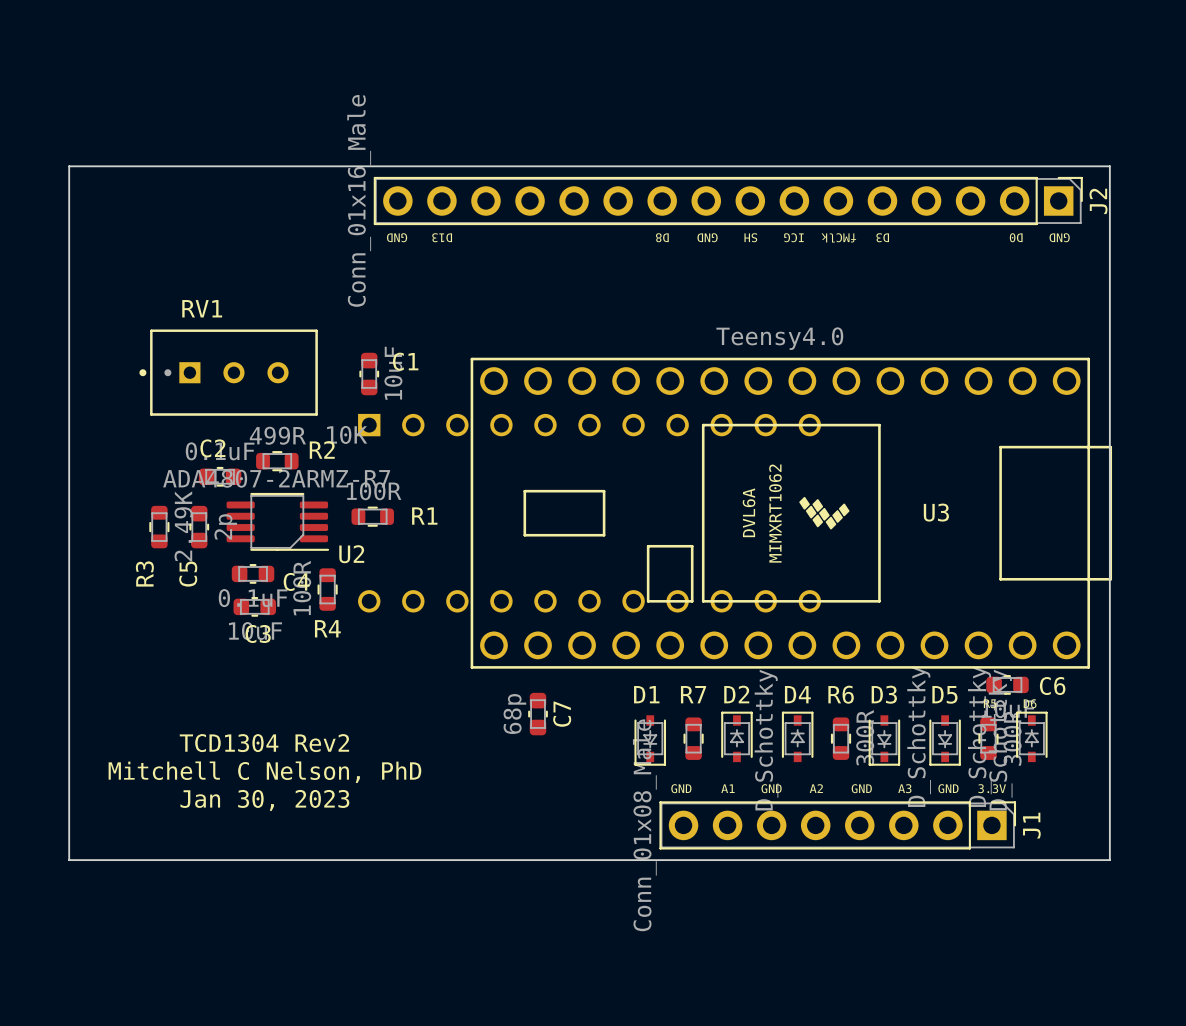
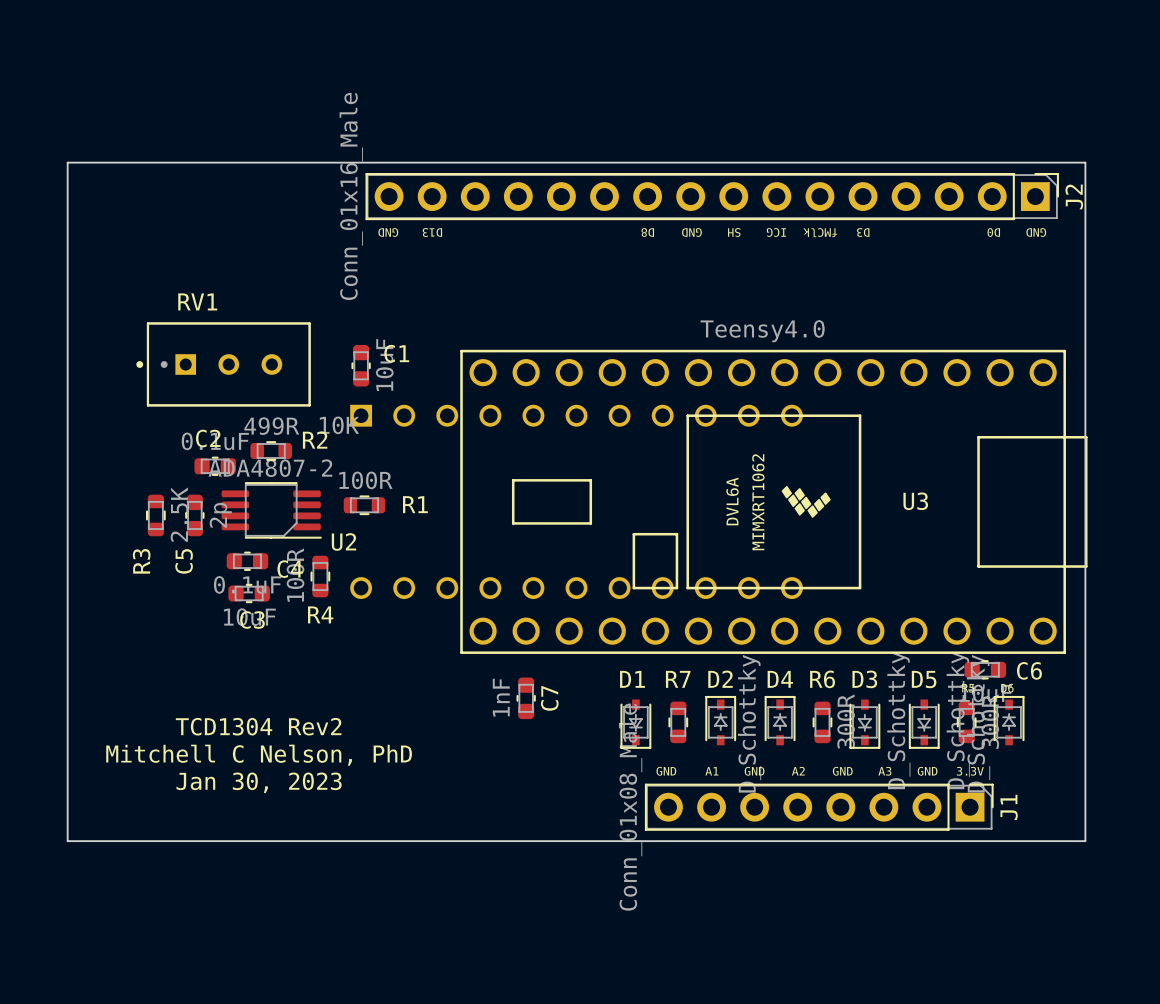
U2 value: ADA4807-2ARMZ-R7 (276, 478) -> ADA4807-2 (270, 468)
R3 value: 2.49K (183, 526) -> 2.5K (179, 514)
C7 value: 68p (514, 714) -> 1nF (501, 697)

